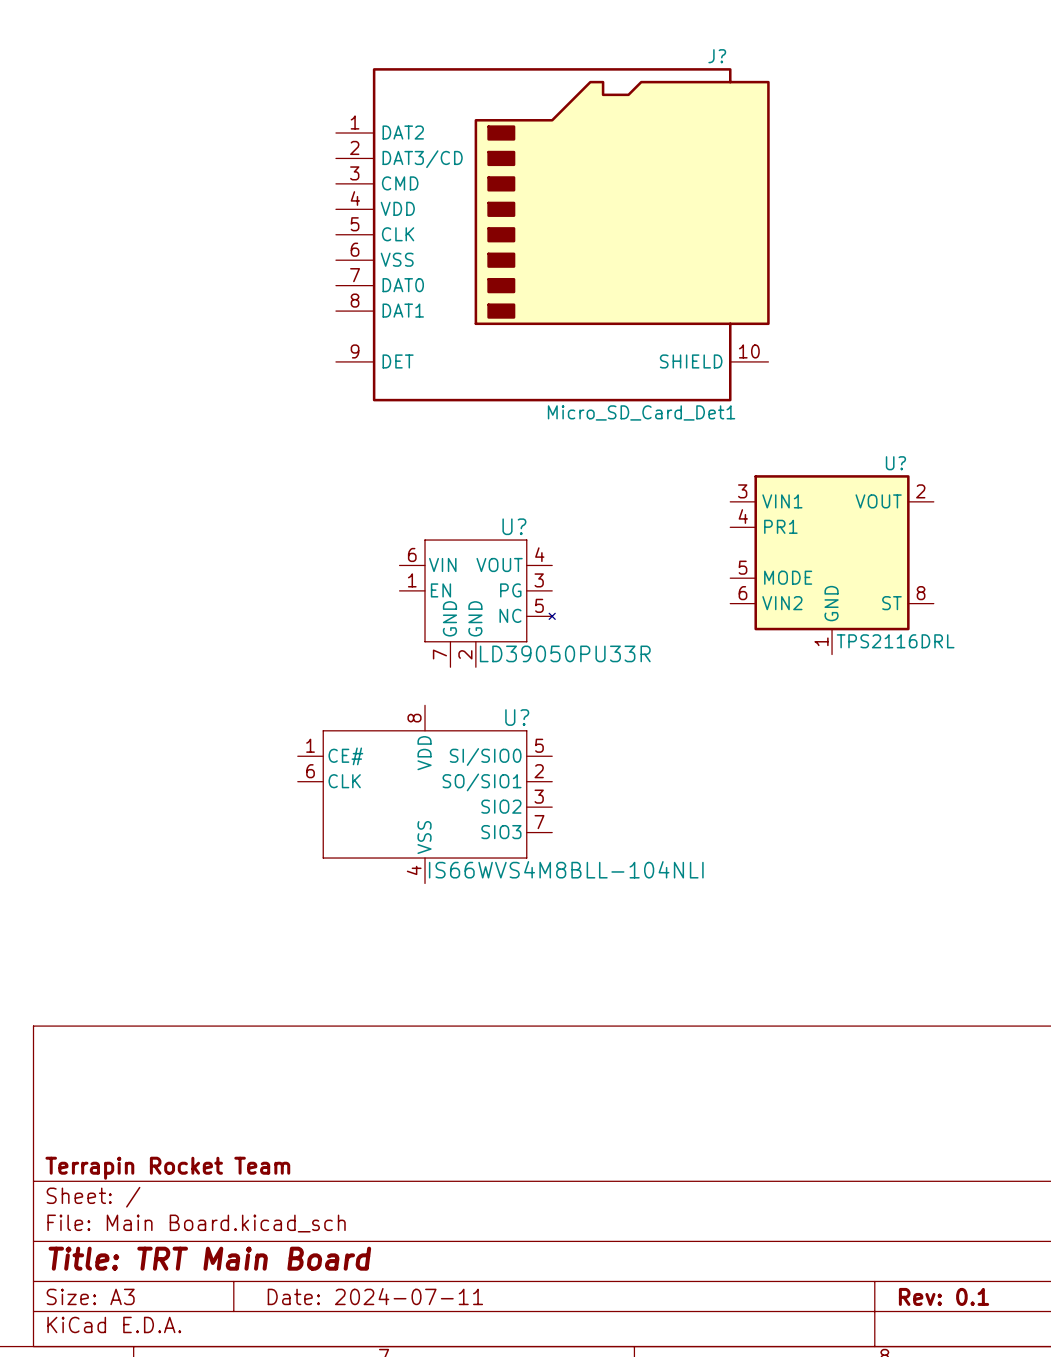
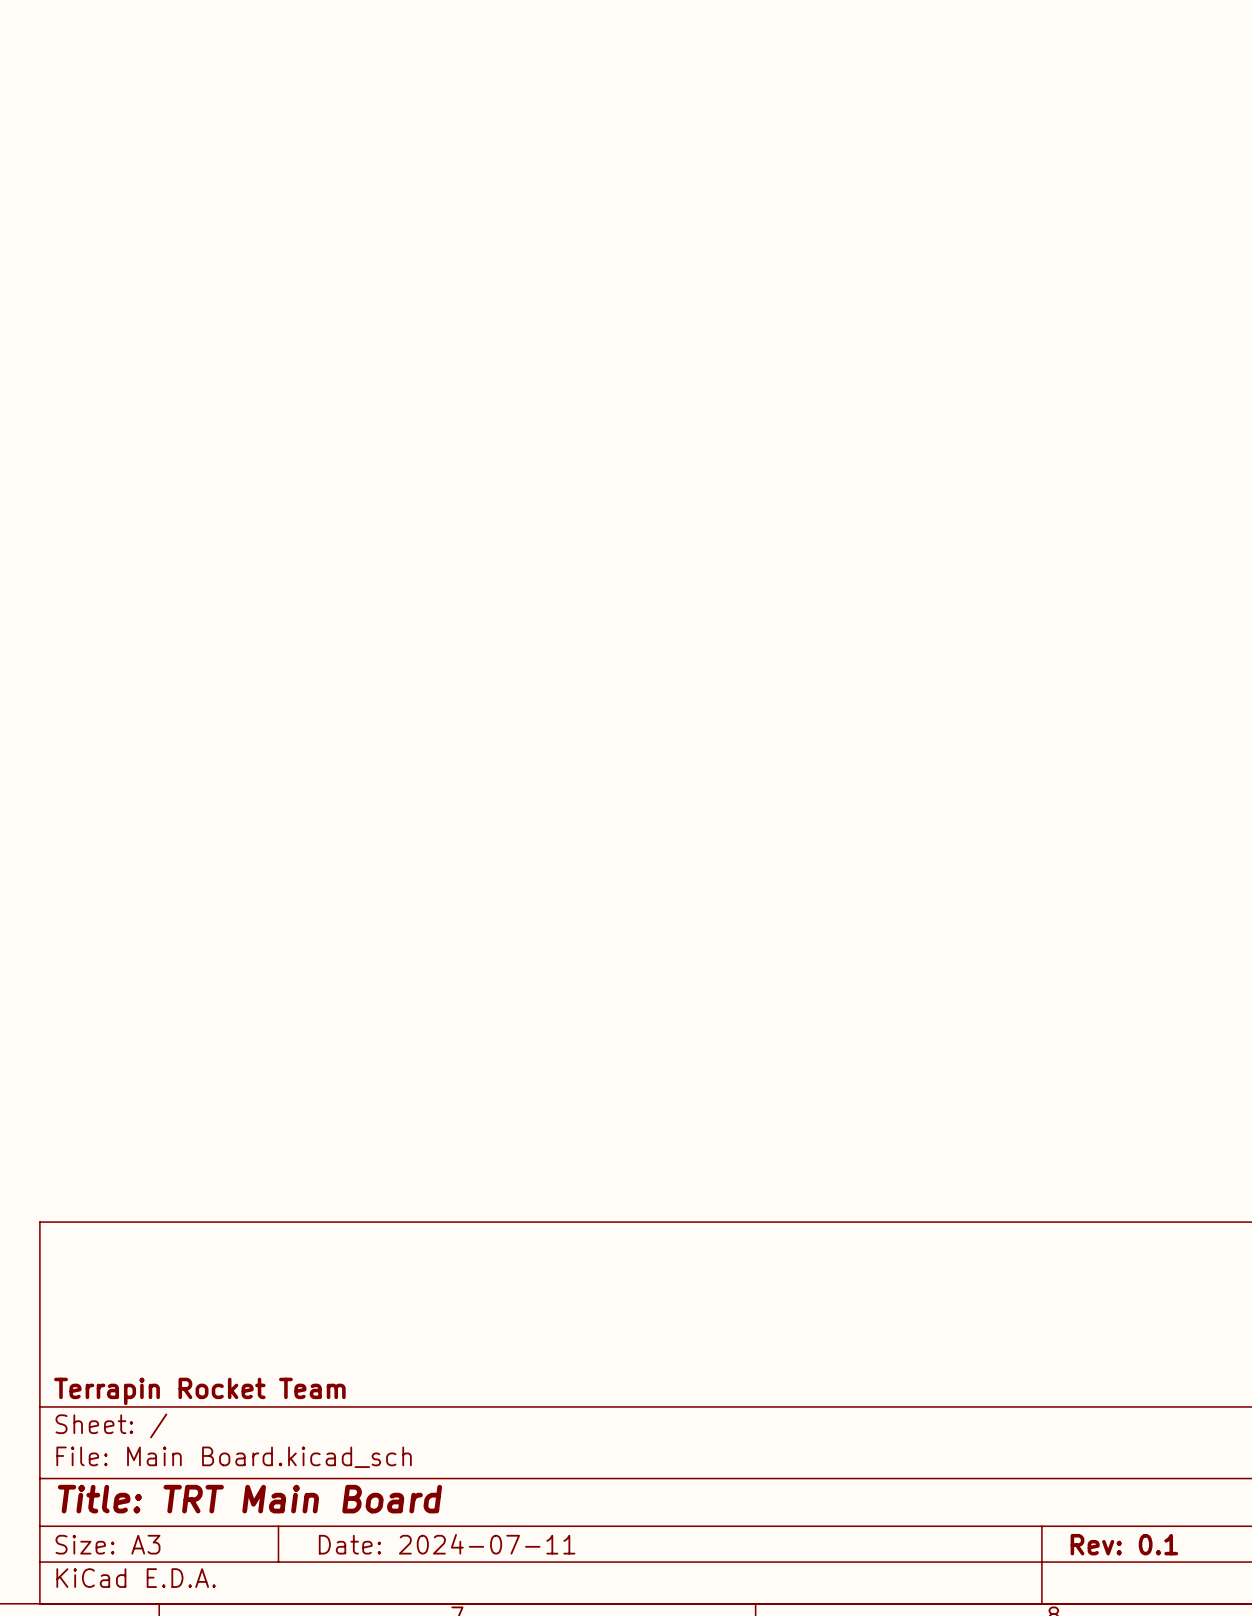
J?: Micro_SD_Card_Det1 (552, 234) -> none
U?: TPS2116DRL (832, 564) -> none
U?: LD39050PU33R (477, 603) -> none
U?: IS66WVS4M8BLL-104NLI (425, 794) -> none

